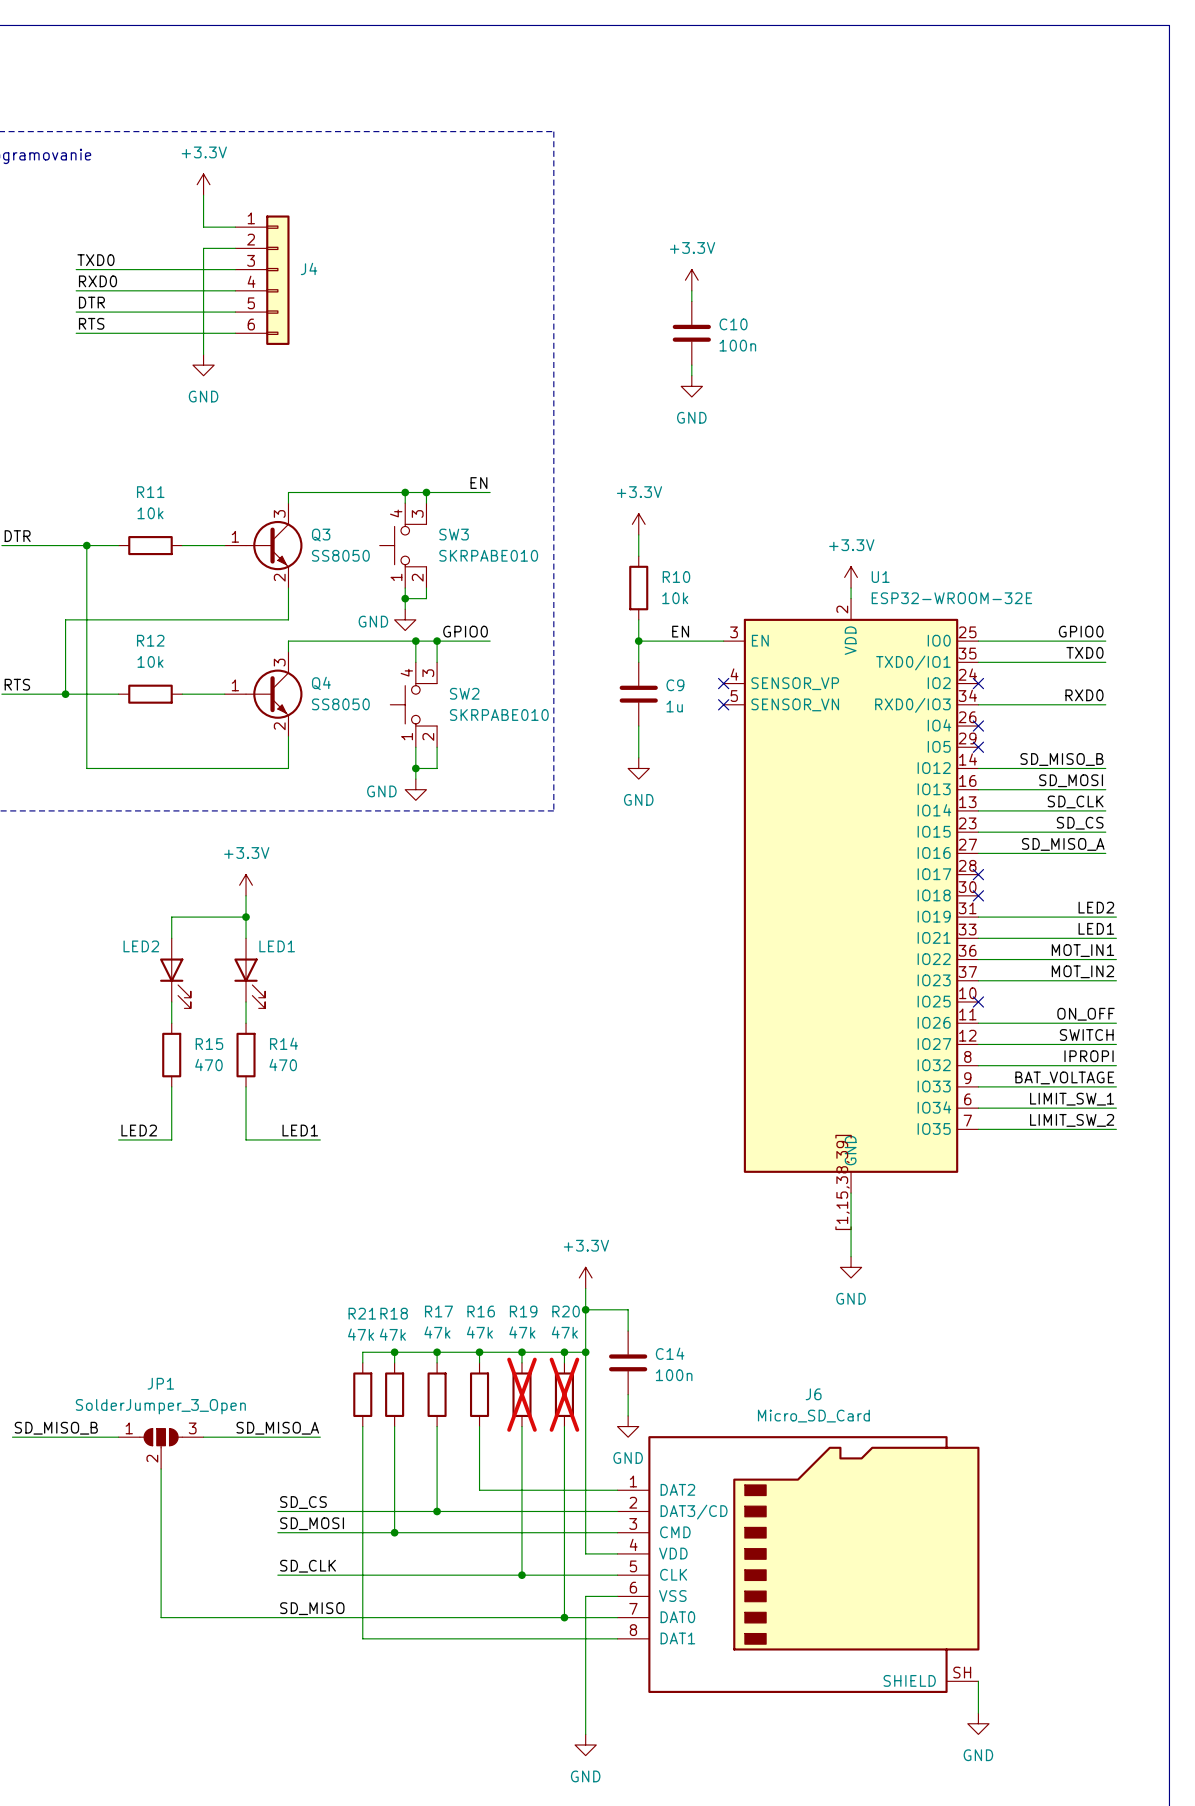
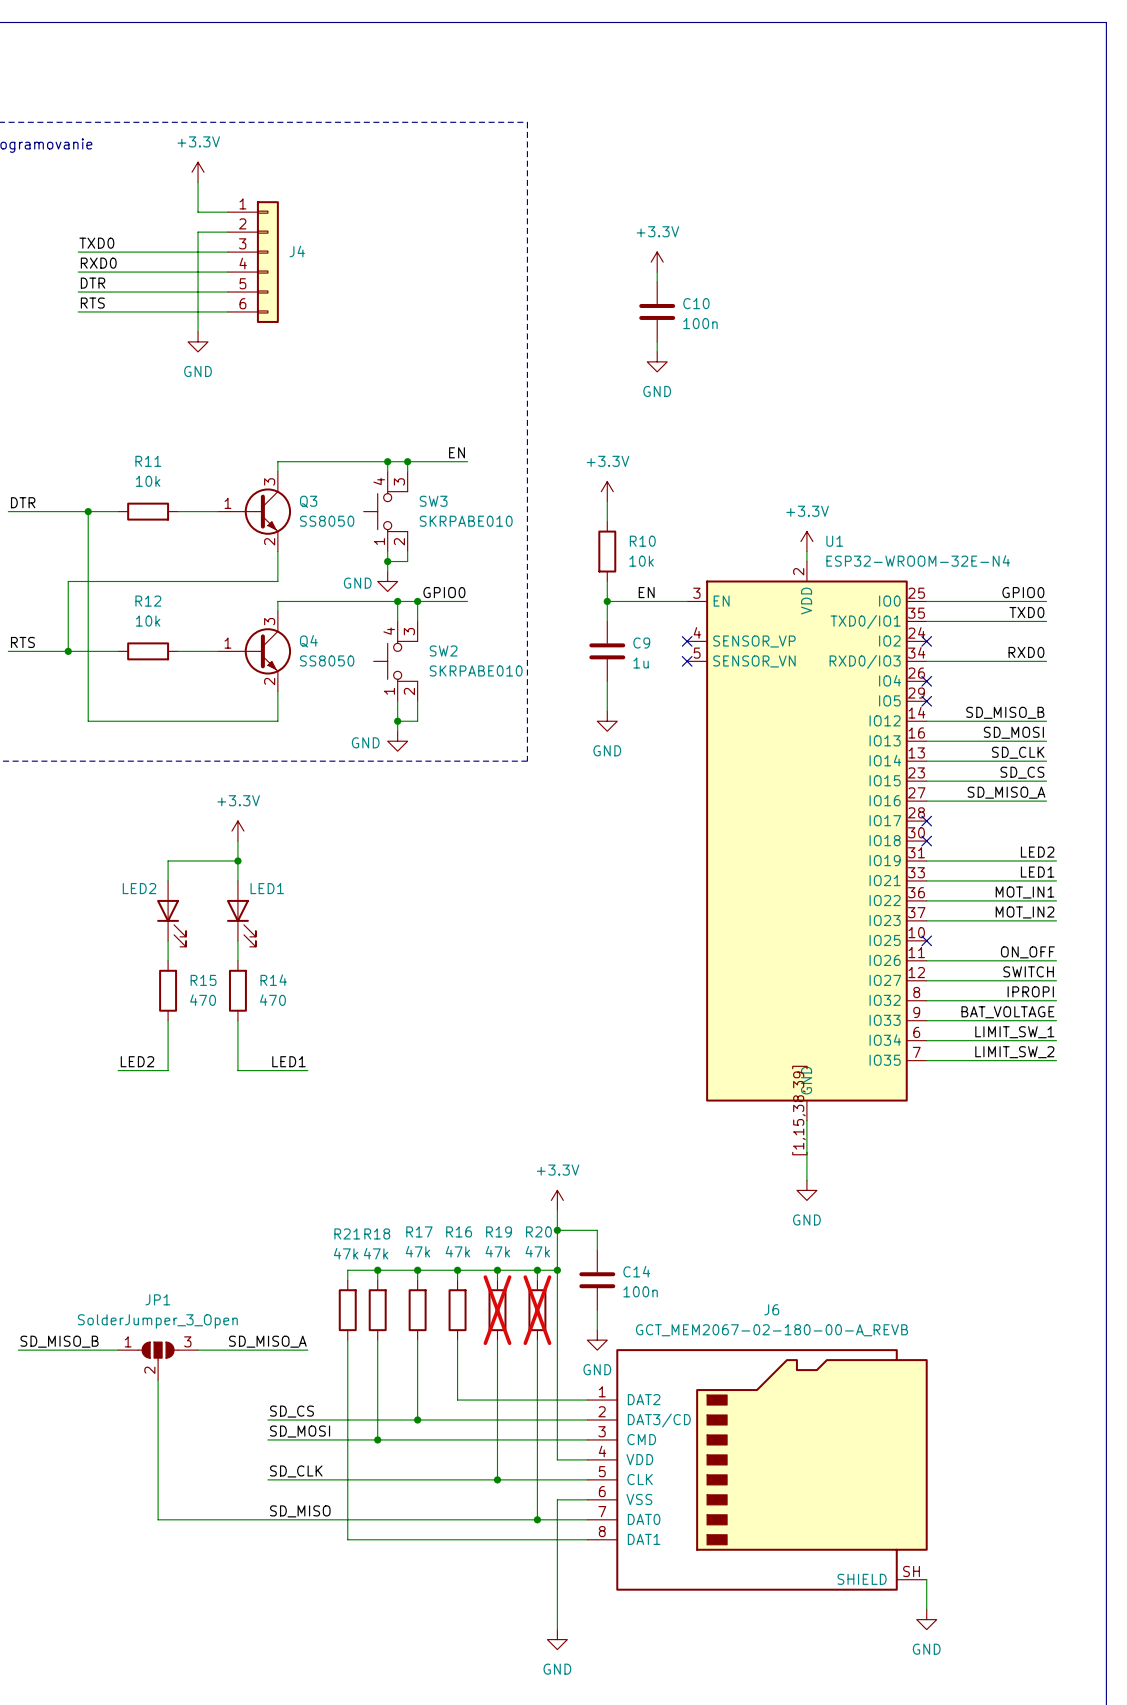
U1 value: ESP32-WROOM-32E (951, 598) -> ESP32-WROOM-32E-N4 (918, 560)
J6 value: Micro_SD_Card (813, 1416) -> GCT_MEM2067-02-180-00-A_REVB (771, 1330)

